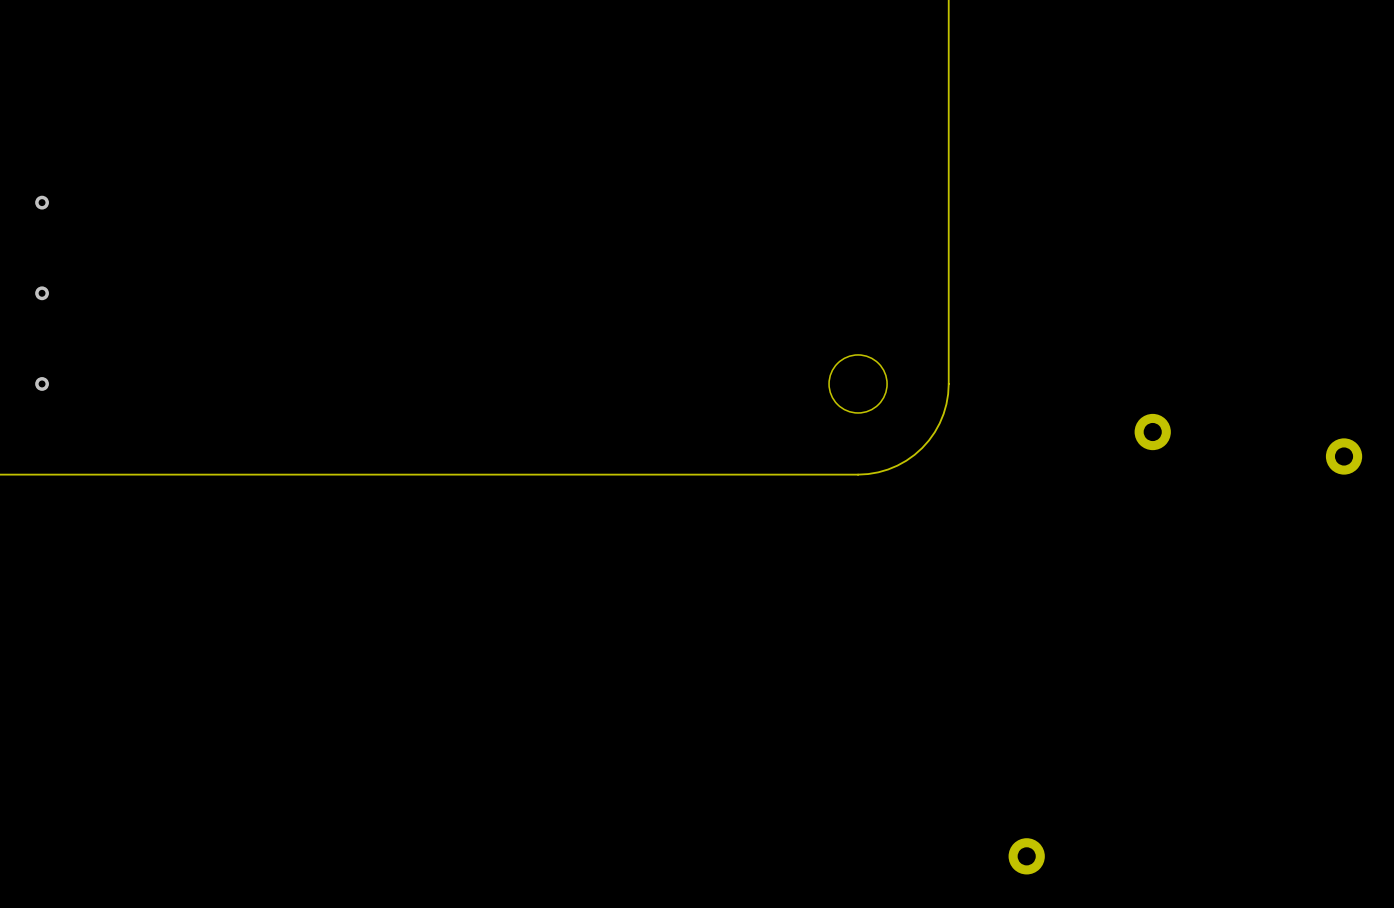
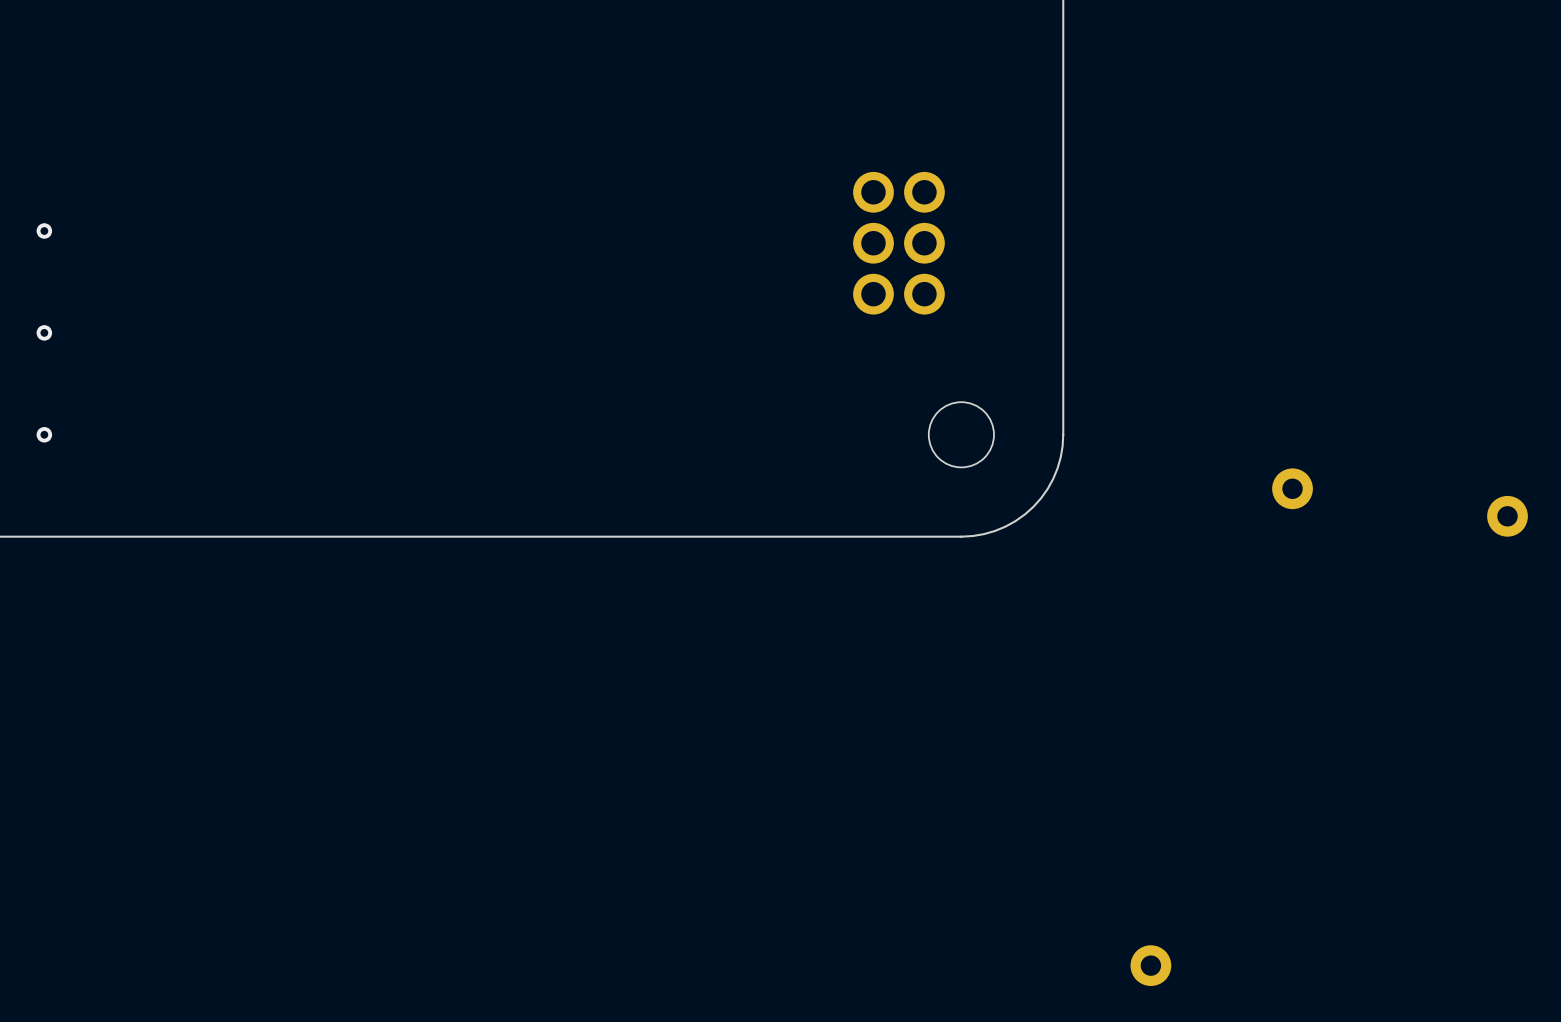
part: none -> (898, 243)

